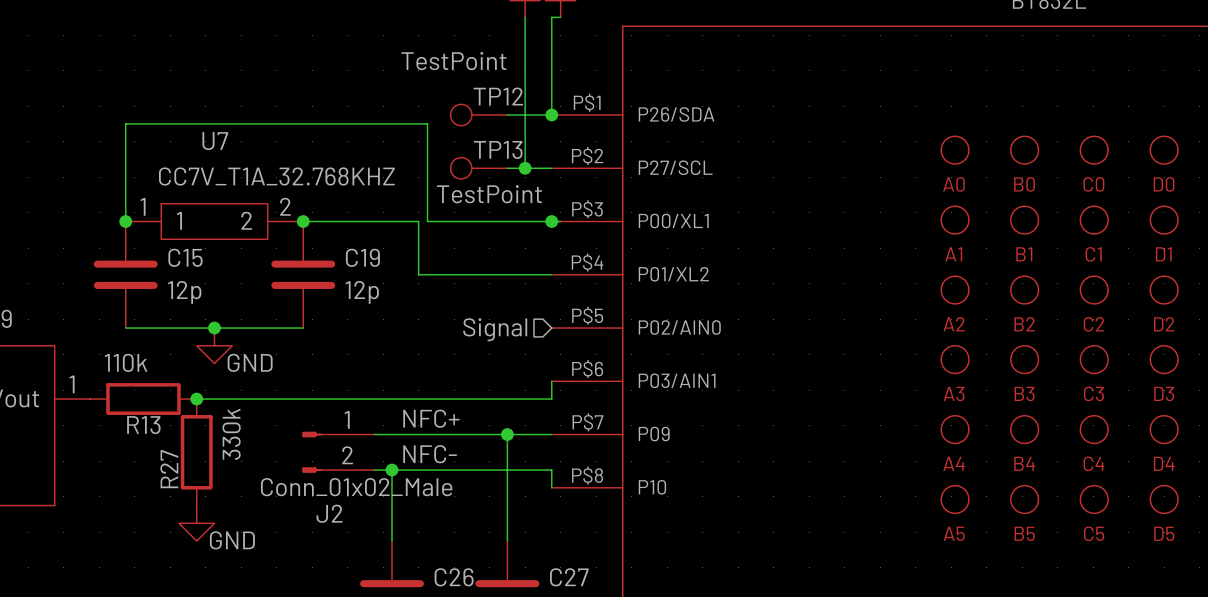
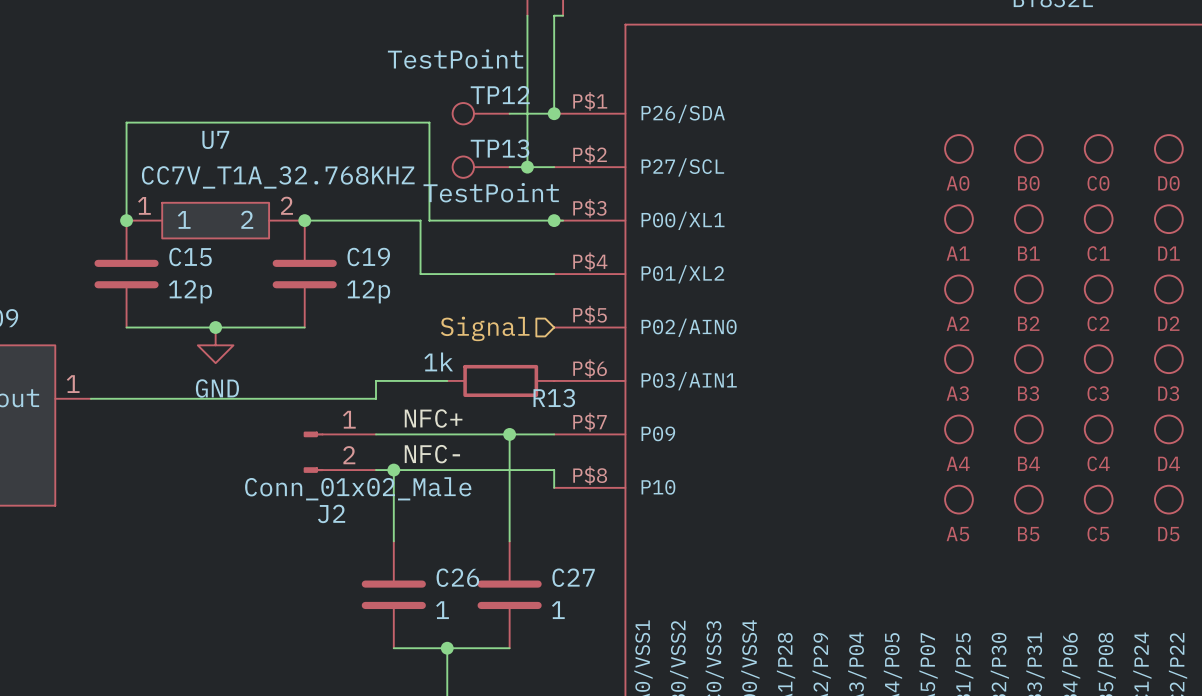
R13 value: 110k (126, 362) -> 1k (438, 361)
power symbol text position: GND (250, 362) -> GND (217, 388)
wire: (551, 381) (551, 399) (374, 399) -> (447, 380) (376, 380) (376, 398)
wire: none -> (90, 398) (197, 398)
R13 position: (143, 399) -> (500, 380)
junction: (196, 399) -> none
R13 name position: R13 (143, 425) -> R13 (554, 398)
R27: 330k (196, 452) -> none
power symbol: GND (196, 523) -> none

